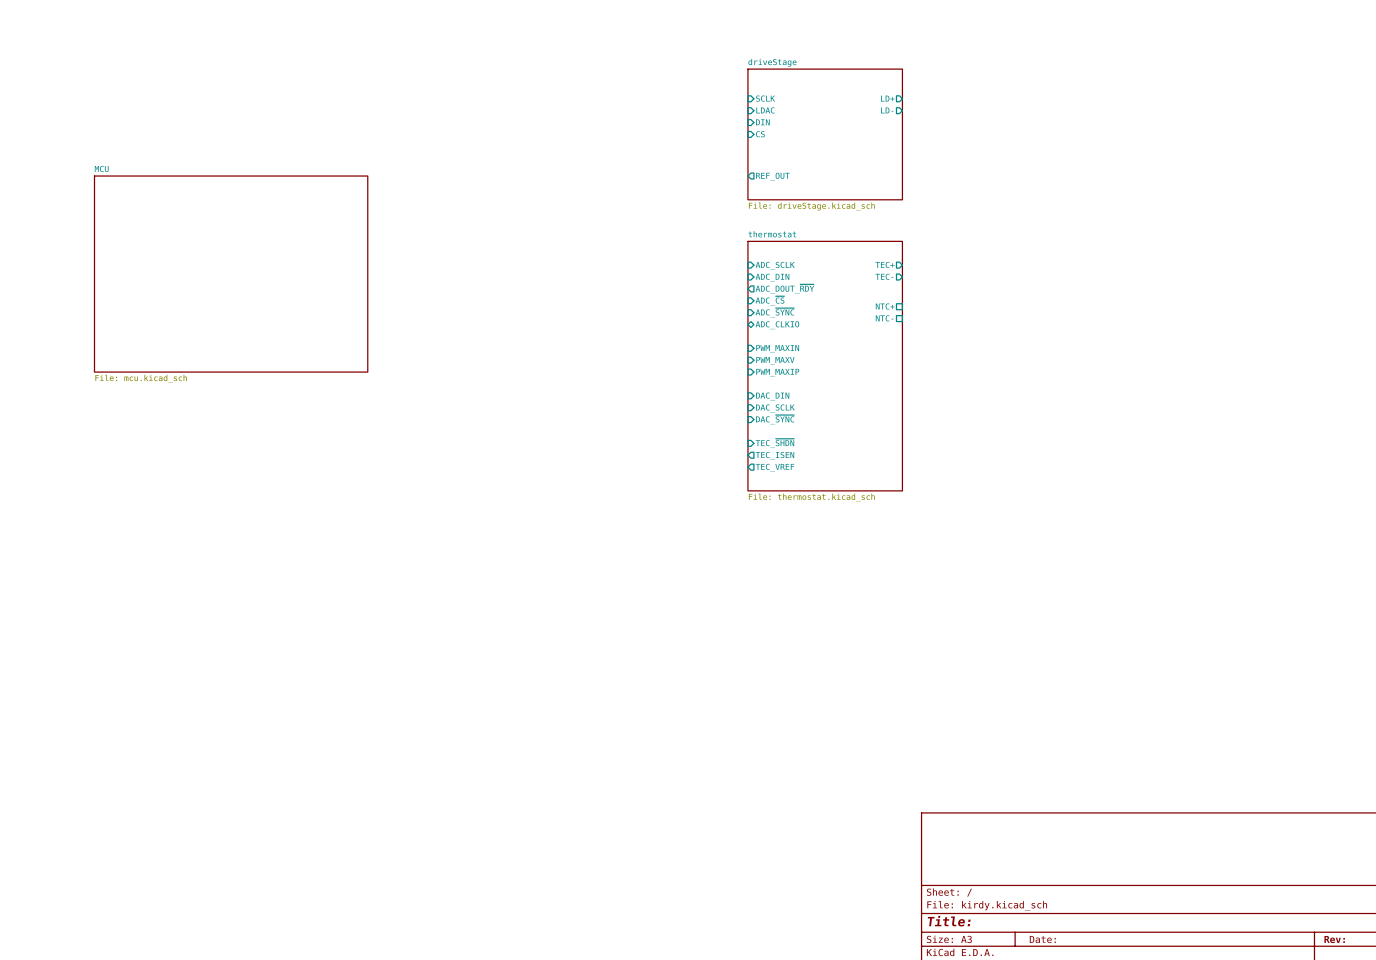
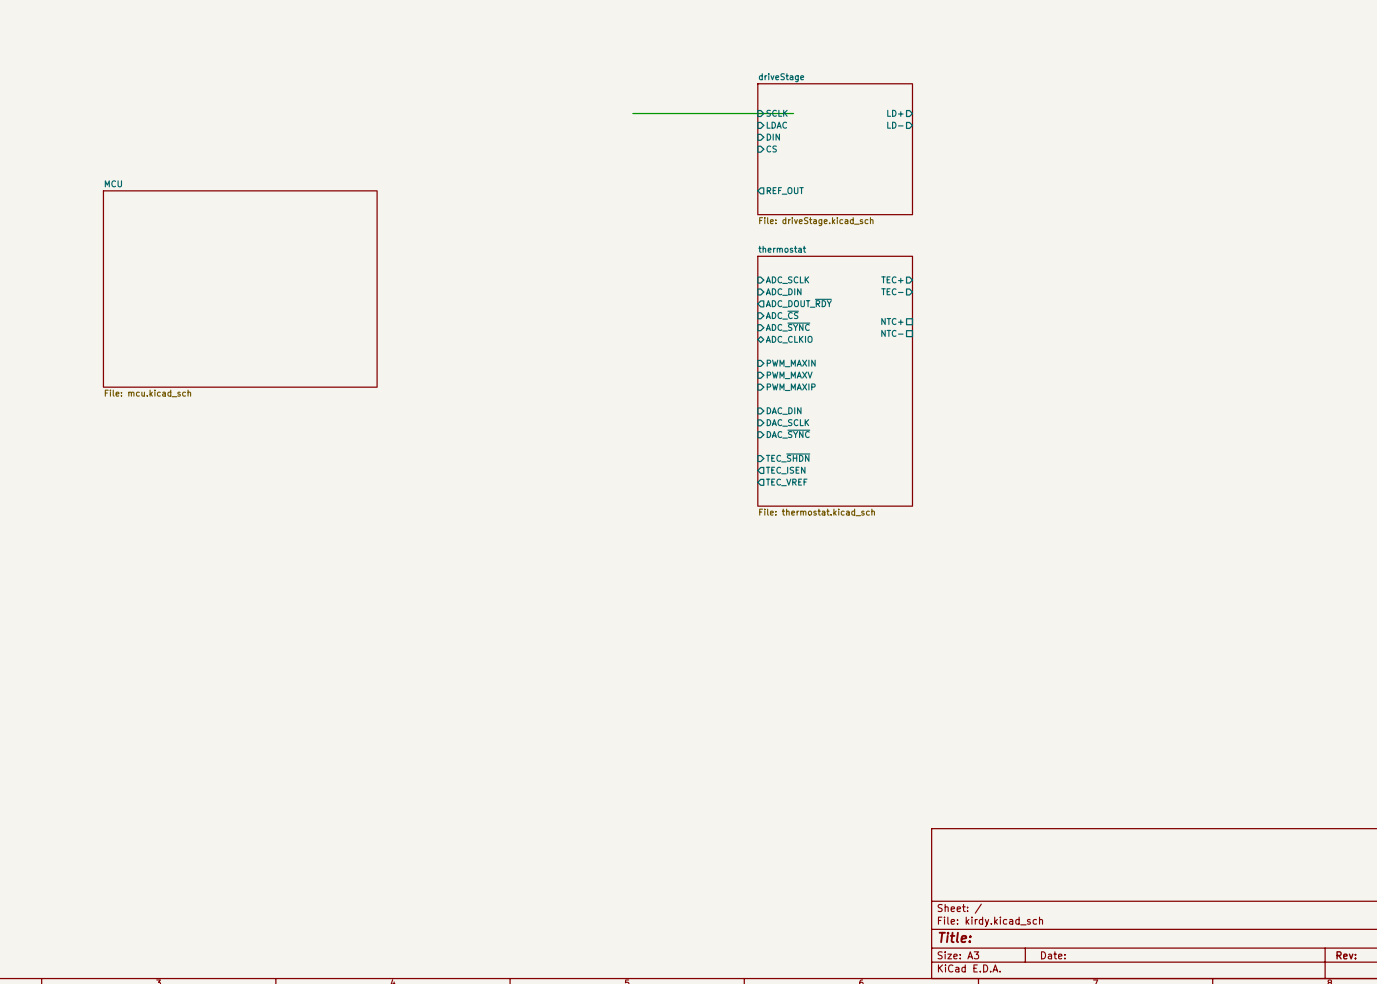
wire: none -> (632, 113) (793, 113)

